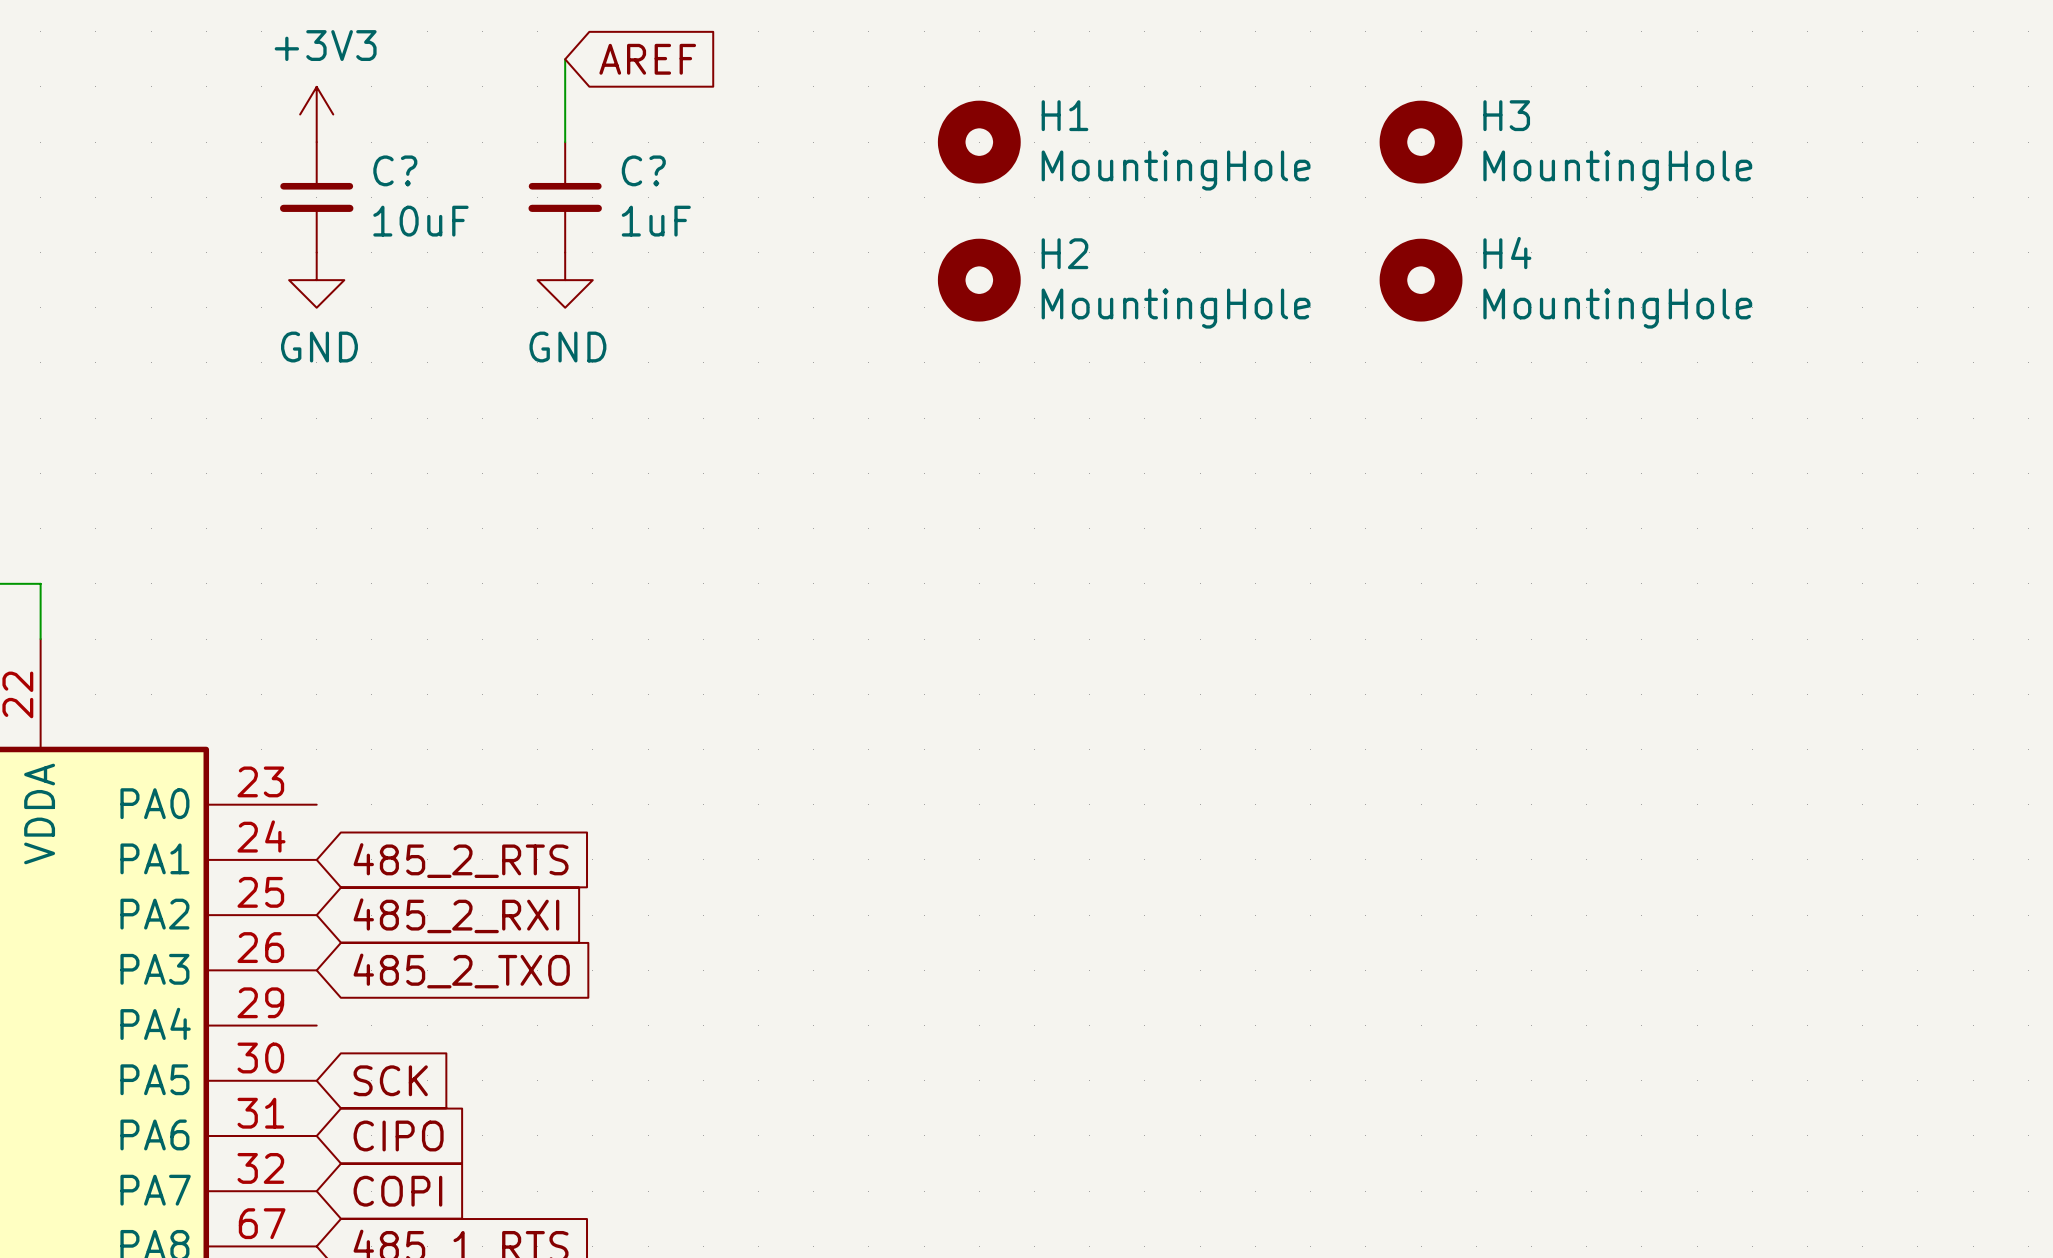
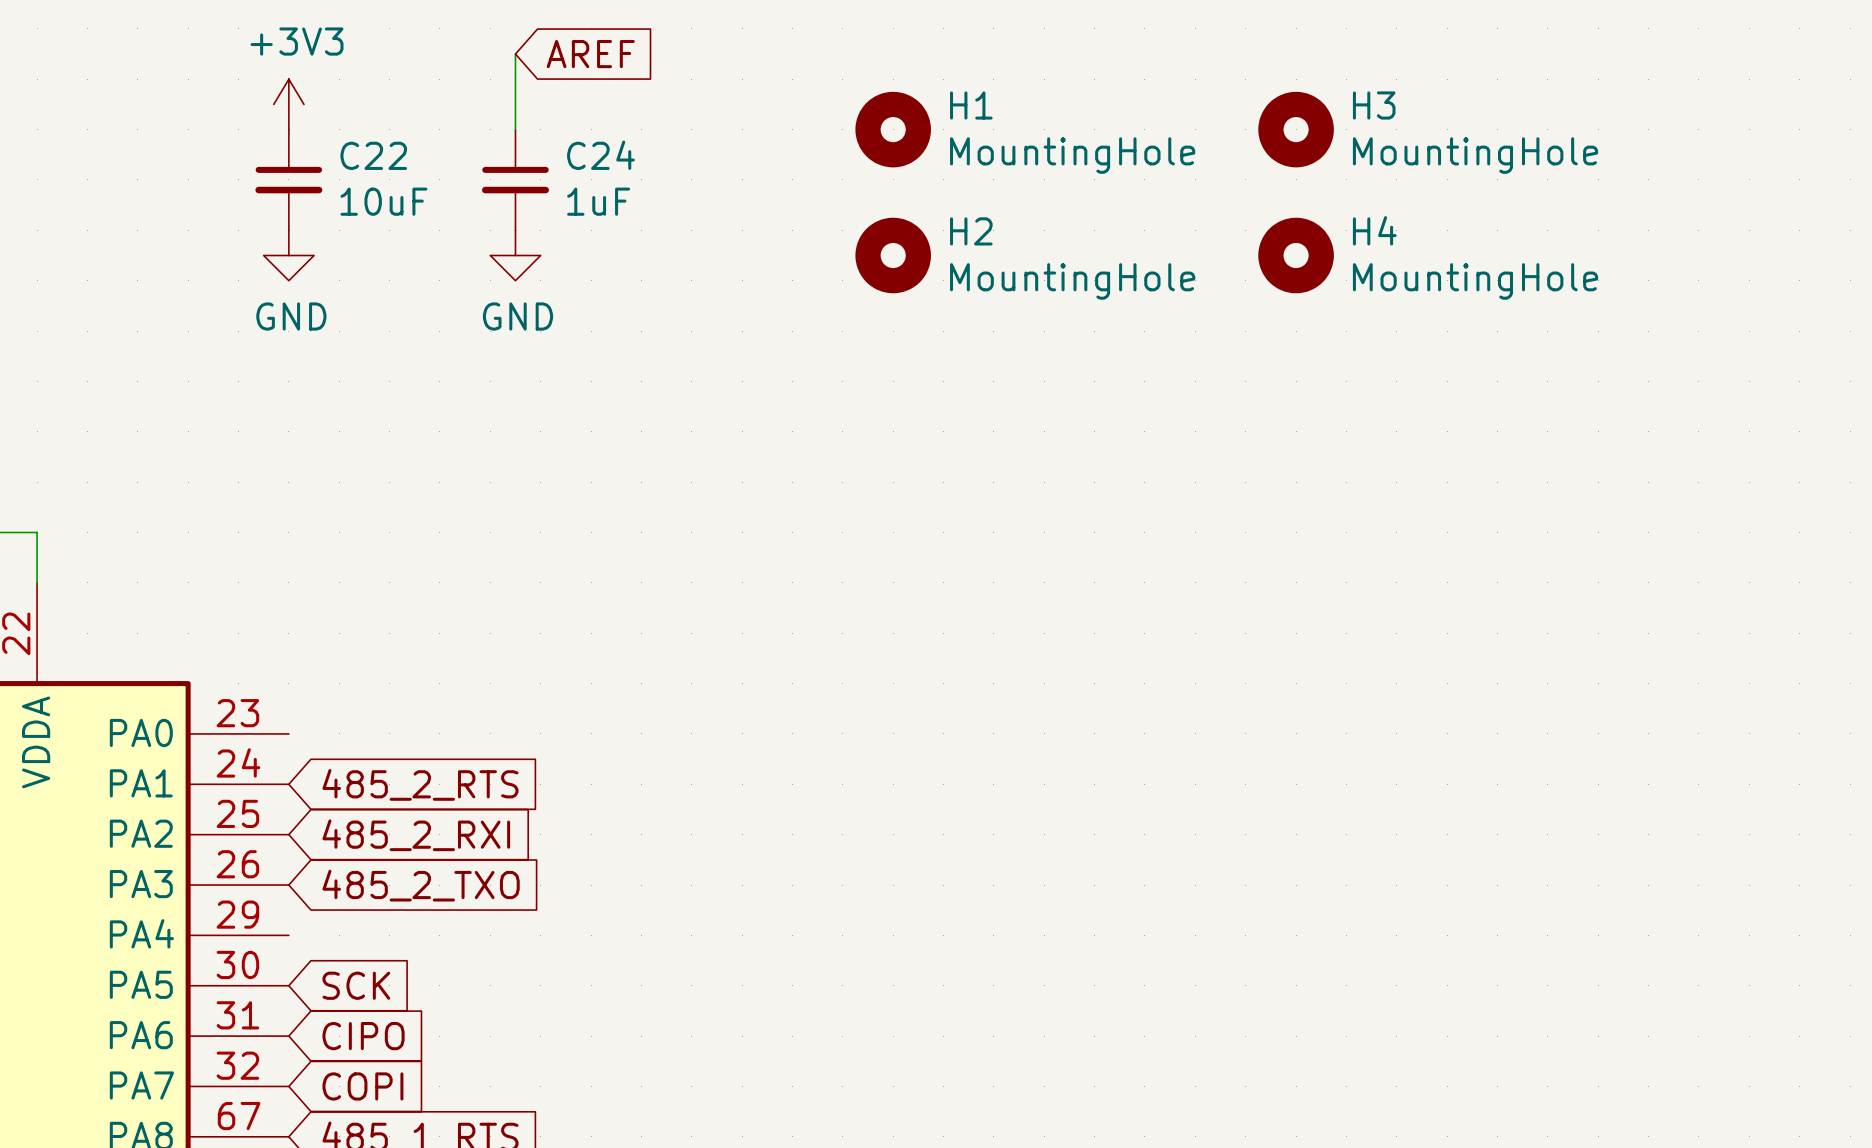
C? name: C? (395, 170) -> C22 (373, 155)
C? name: C? (643, 170) -> C24 (600, 155)

